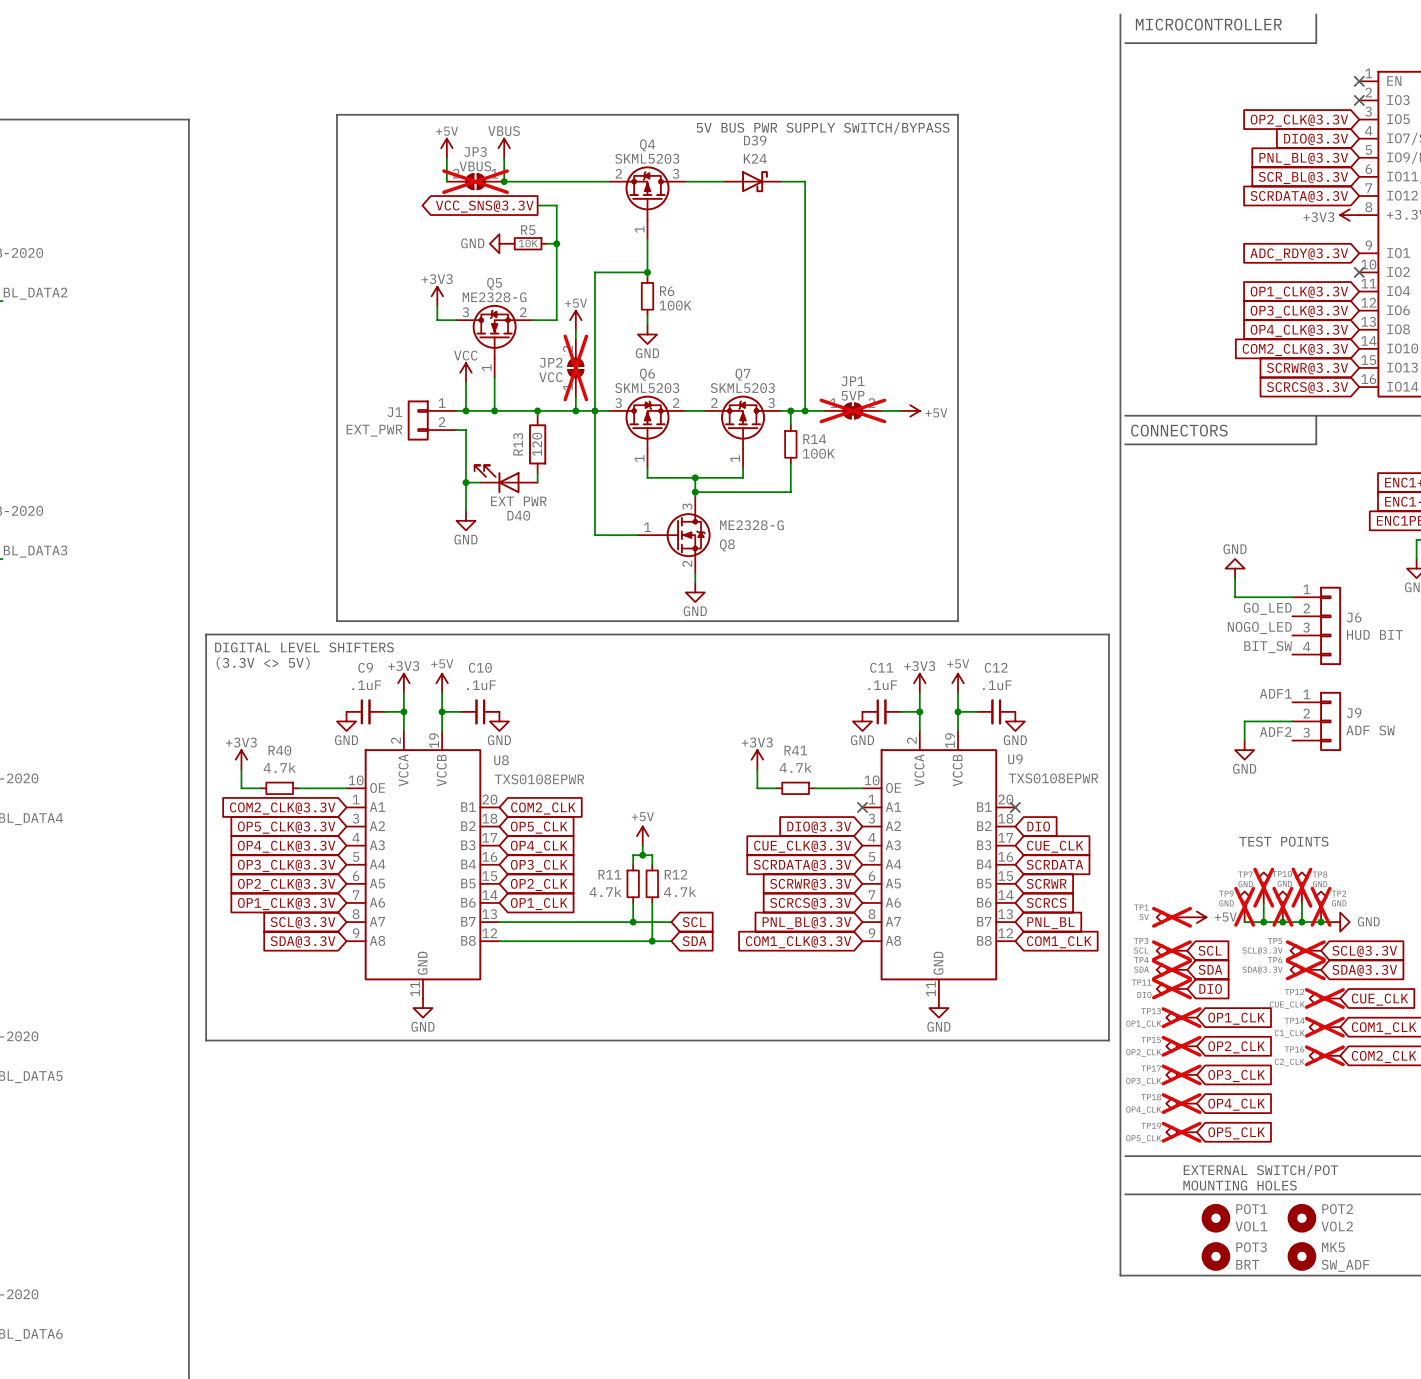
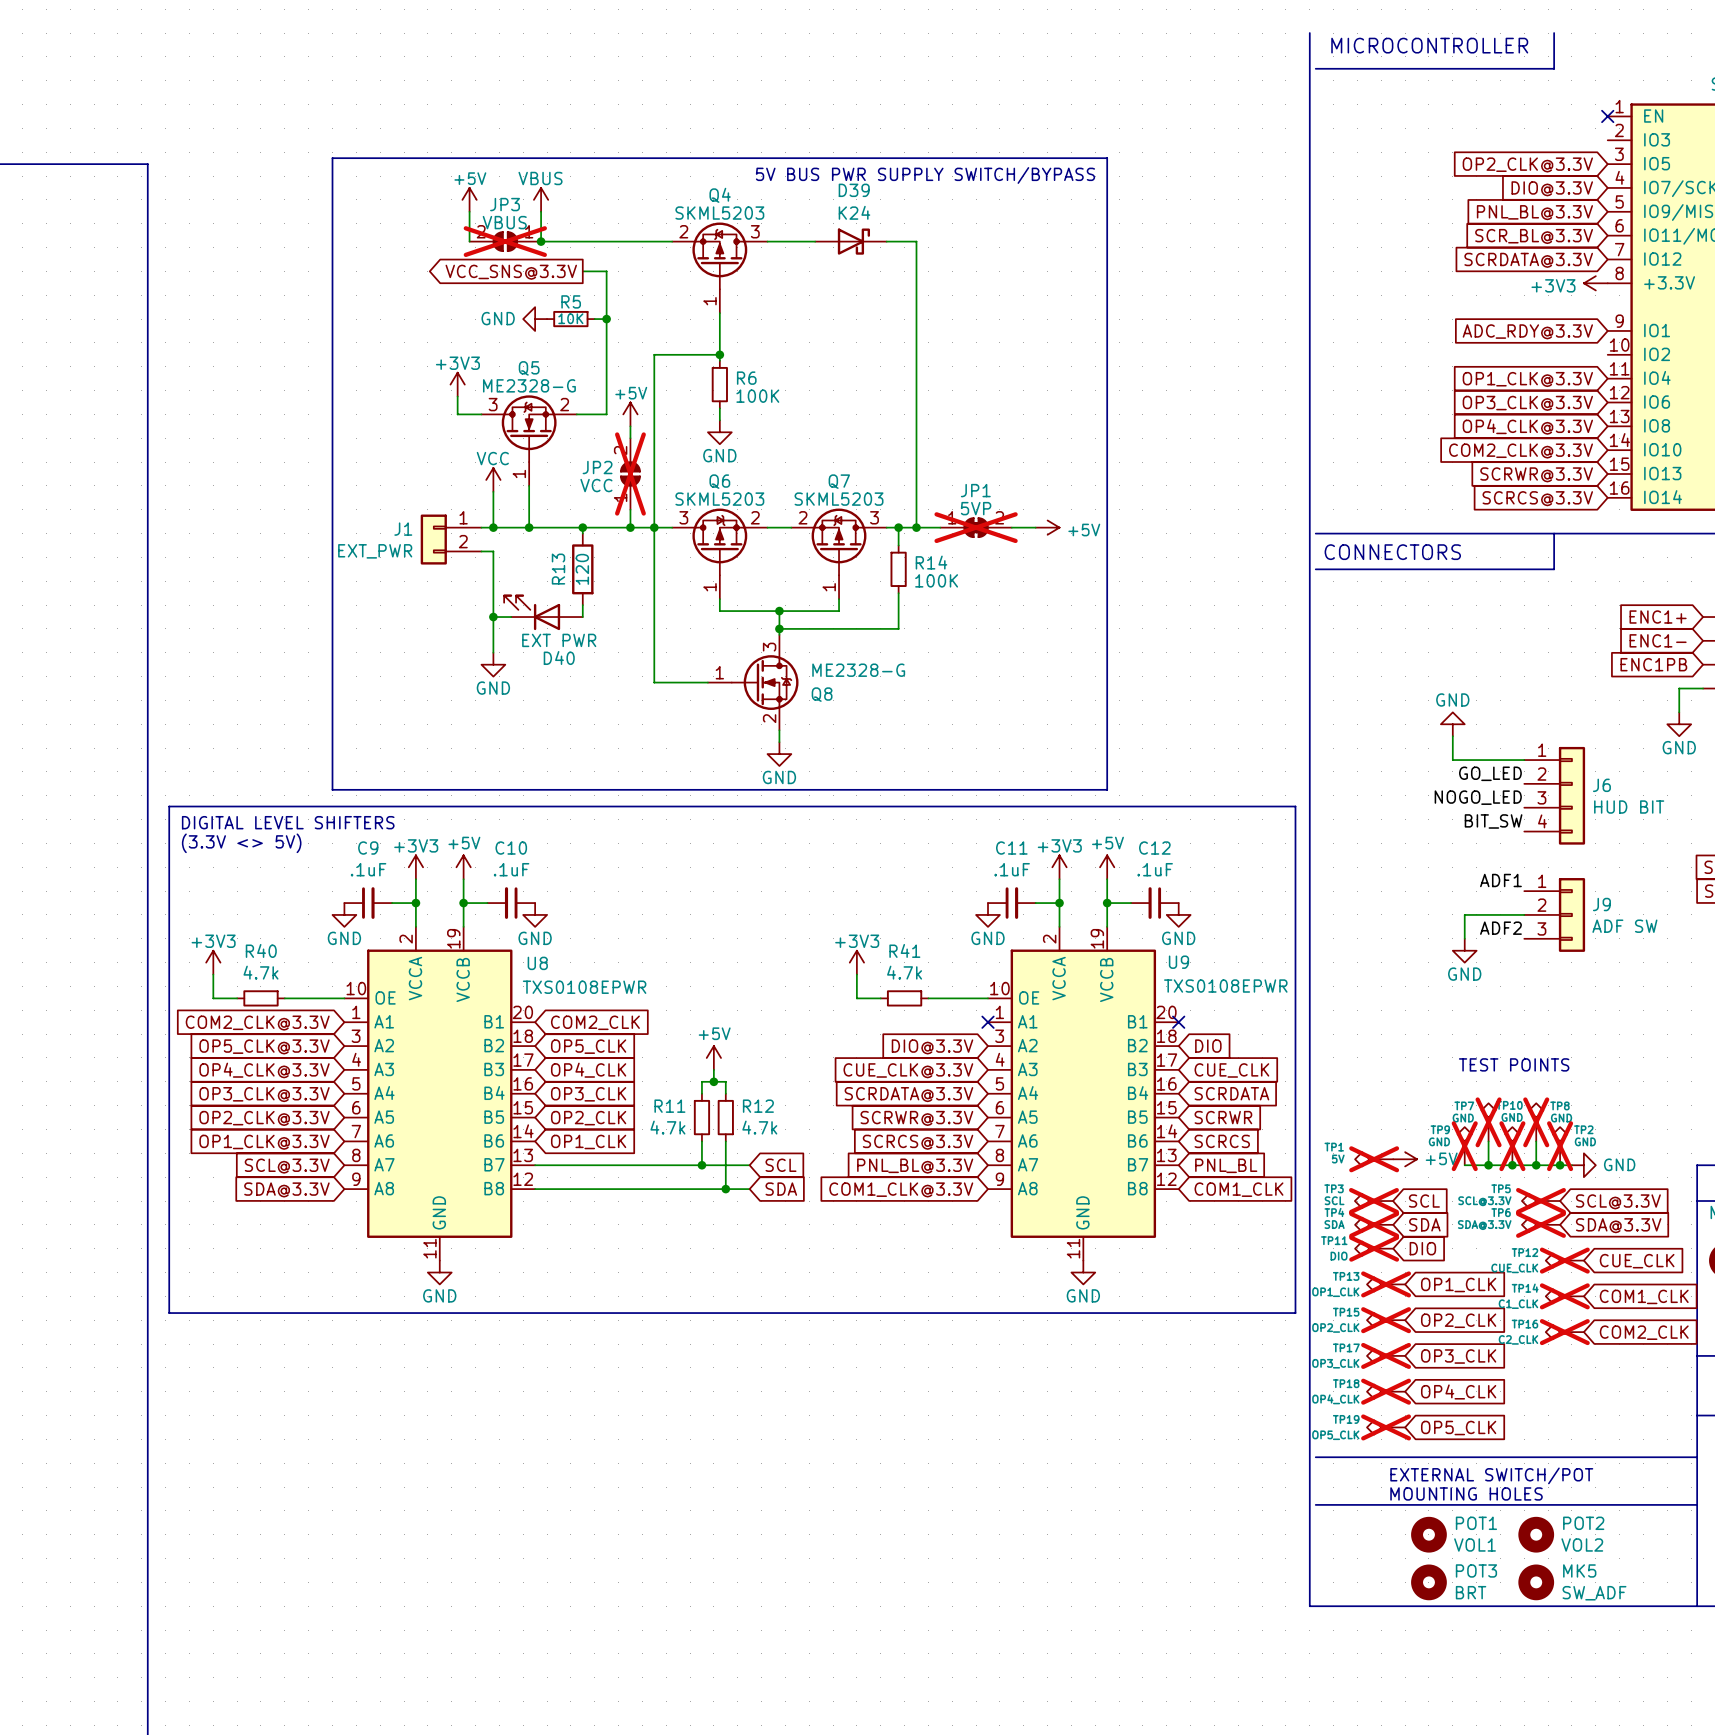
no-connect mark: (1359, 100) -> none
no-connect mark: (1359, 272) -> none

